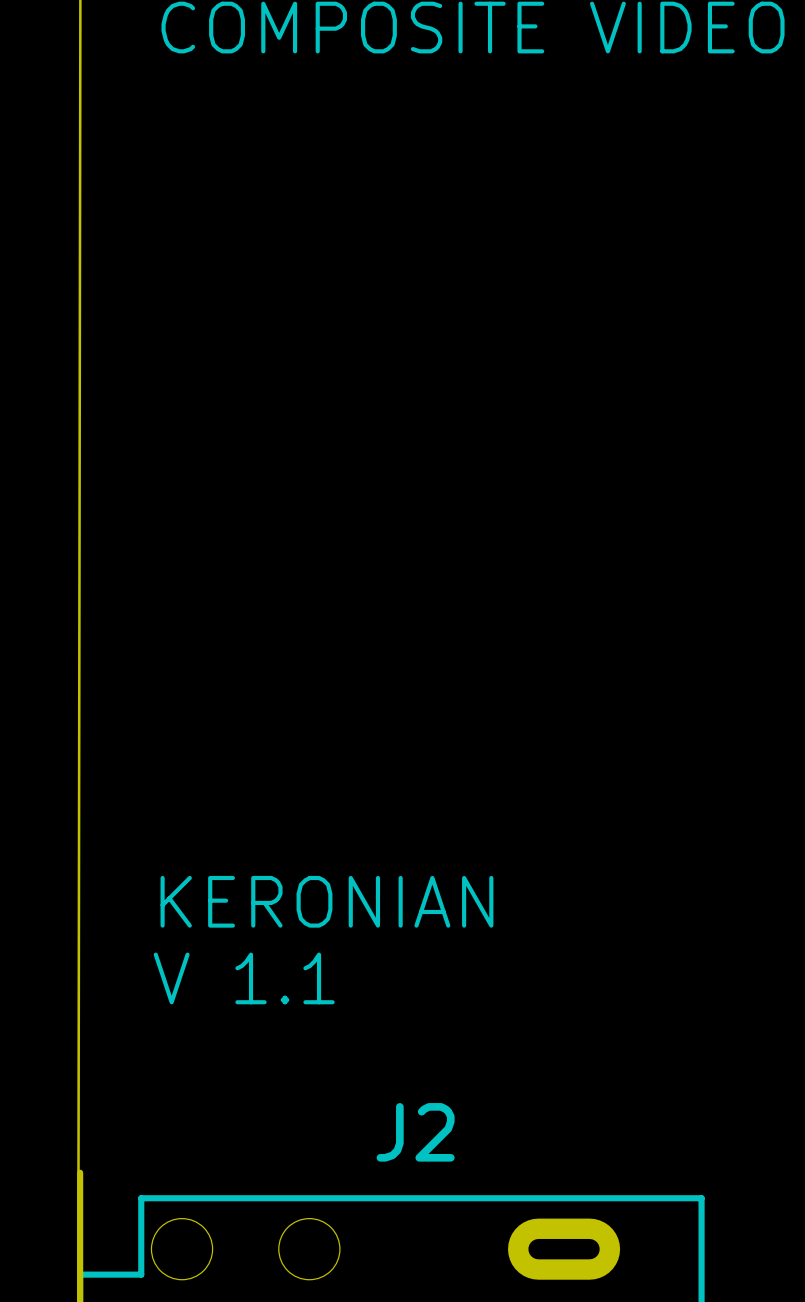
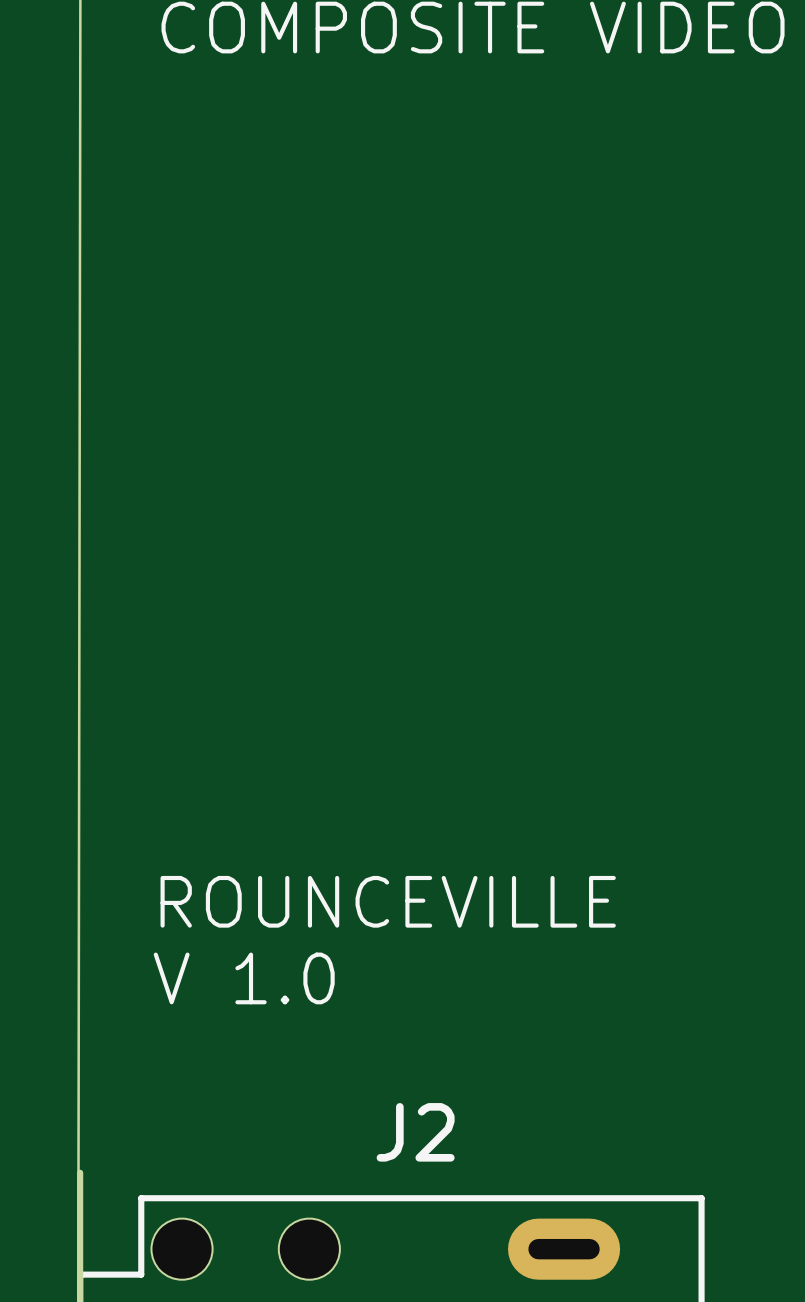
text: KERONIAN (326, 901) -> ROUNCEVILLE (388, 901)
text: V 1.1 (244, 978) -> V 1.0 (244, 978)

